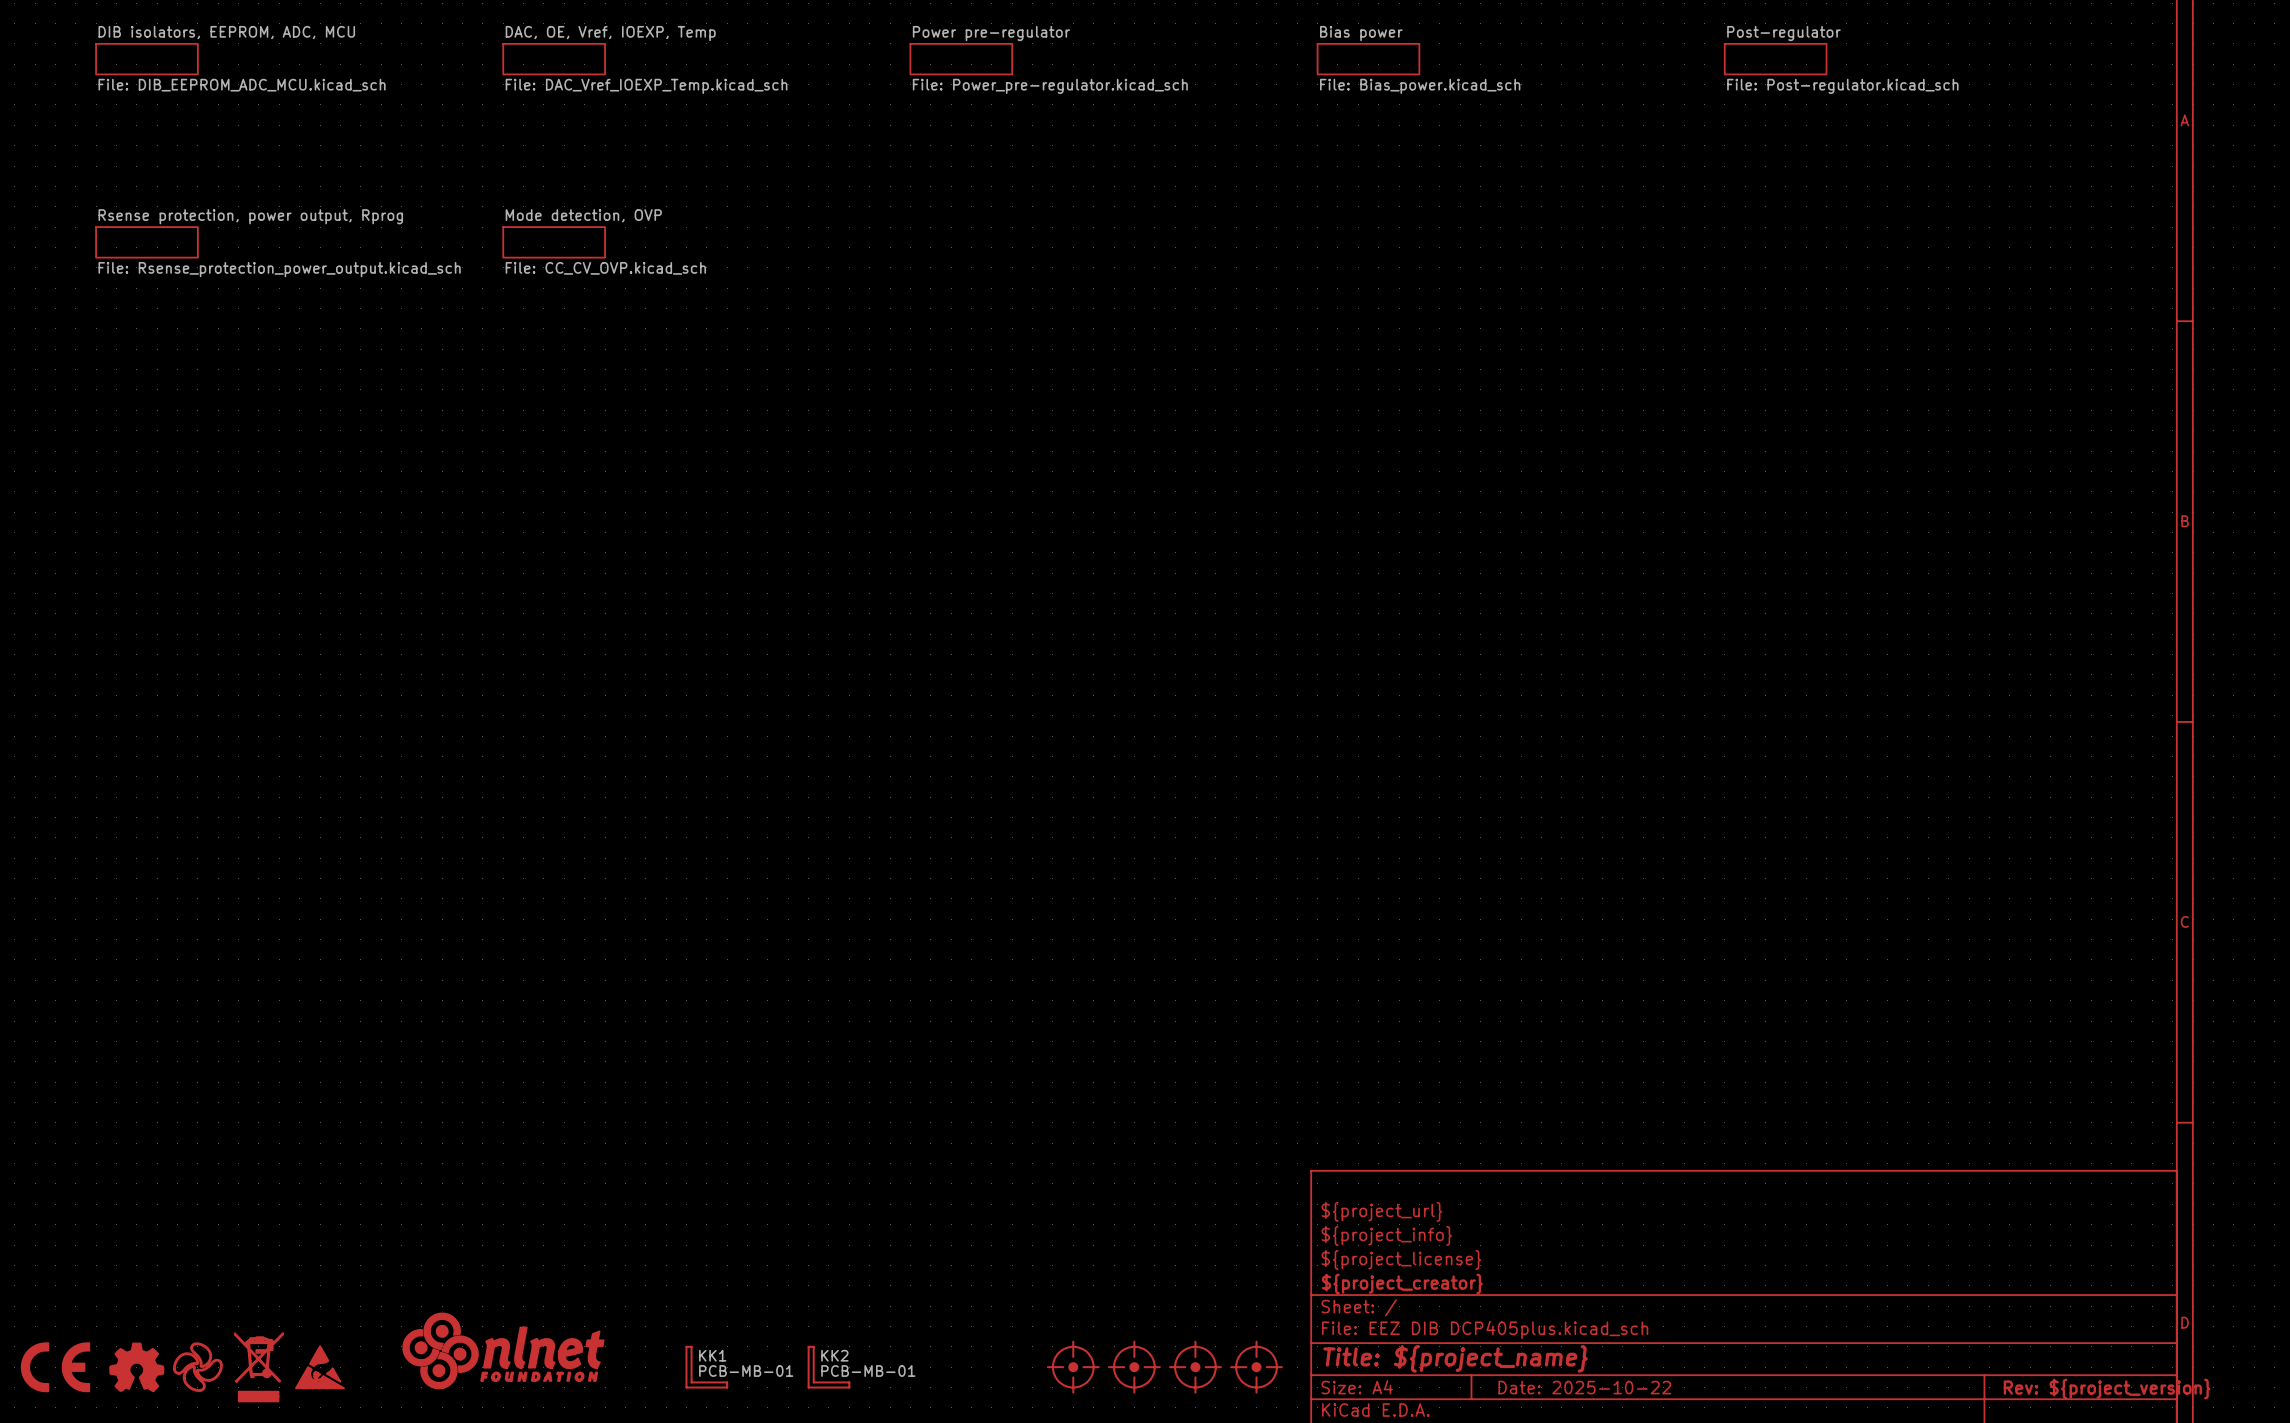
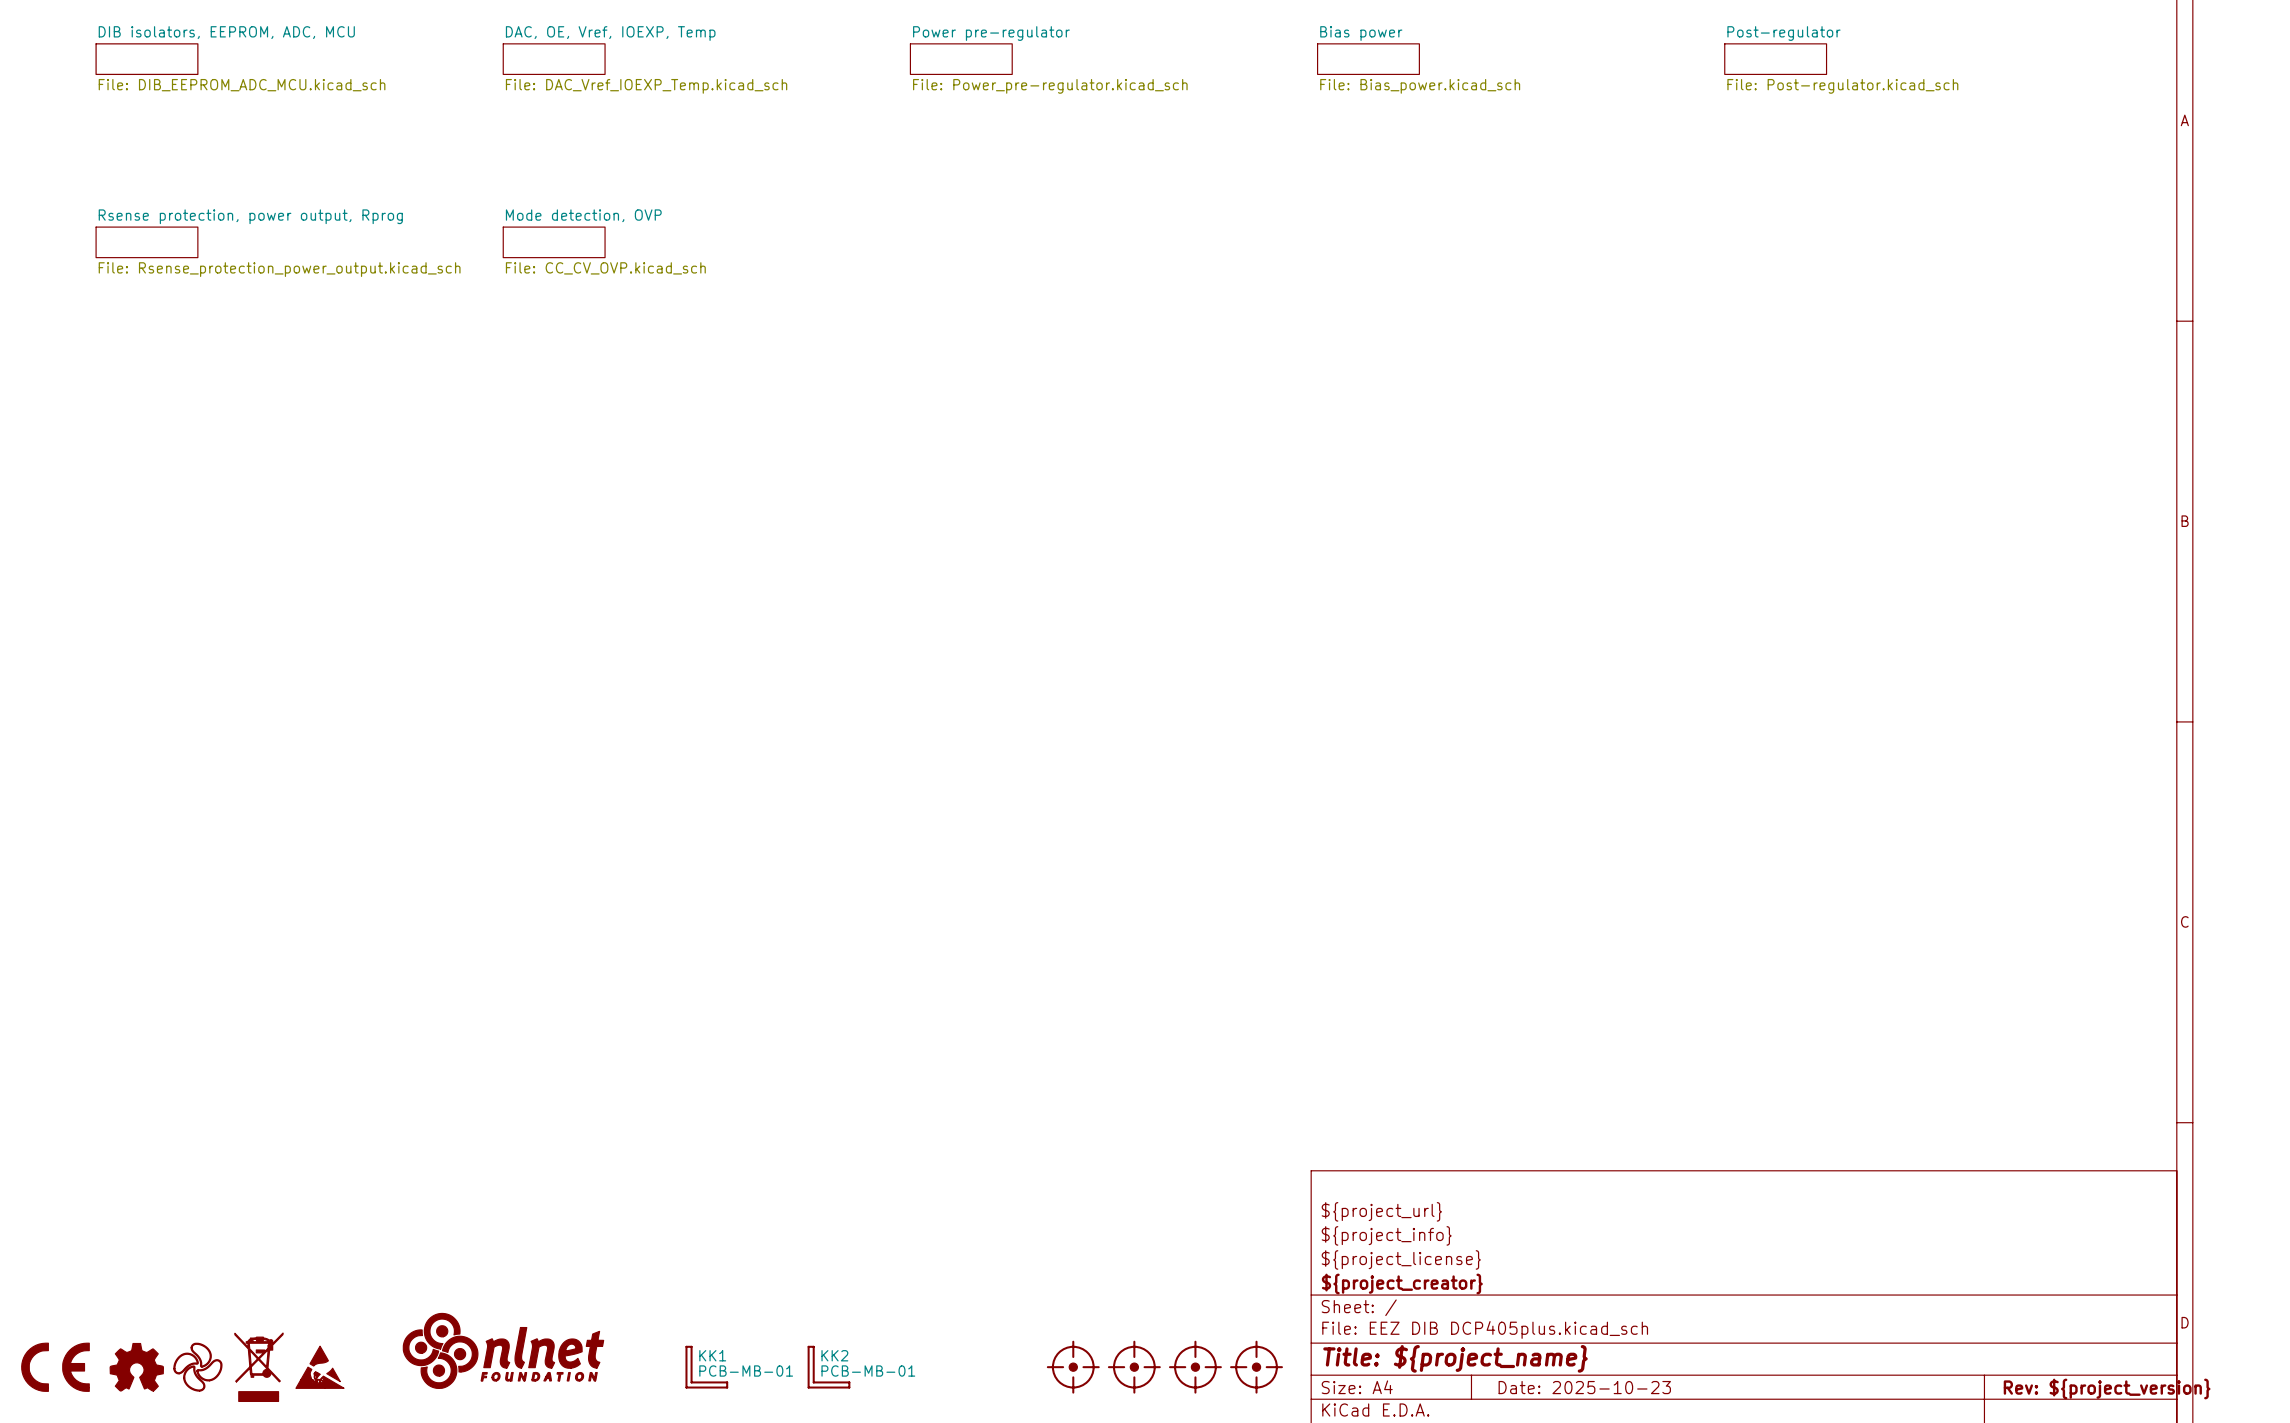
title block: Date: 2025-10-22 (1584, 1387) -> Date: 2025-10-23 (1584, 1387)

